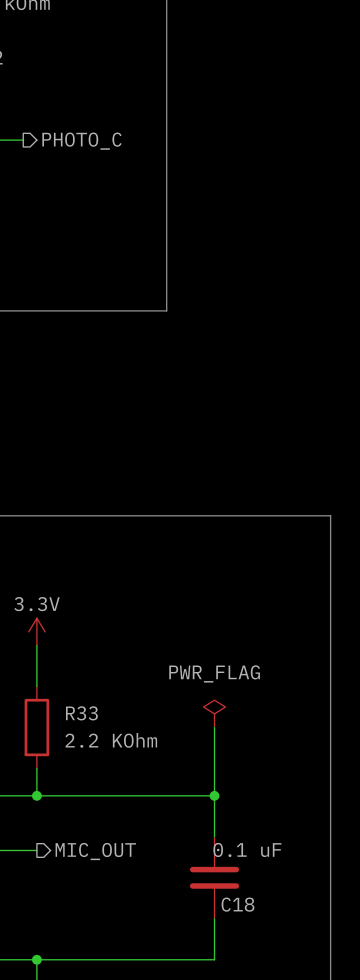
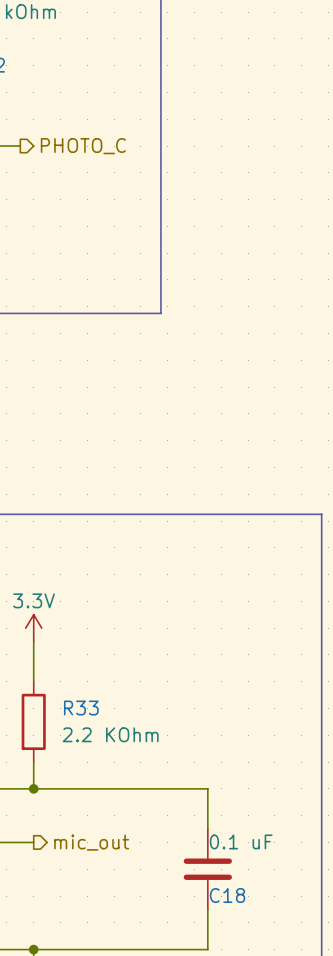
power symbol: PWR_FLAG (214, 713) -> none
wire: (214, 727) (214, 795) -> none
junction: (214, 795) -> none
hierarchical label: MIC_OUT (95, 851) -> mic_out (91, 842)

